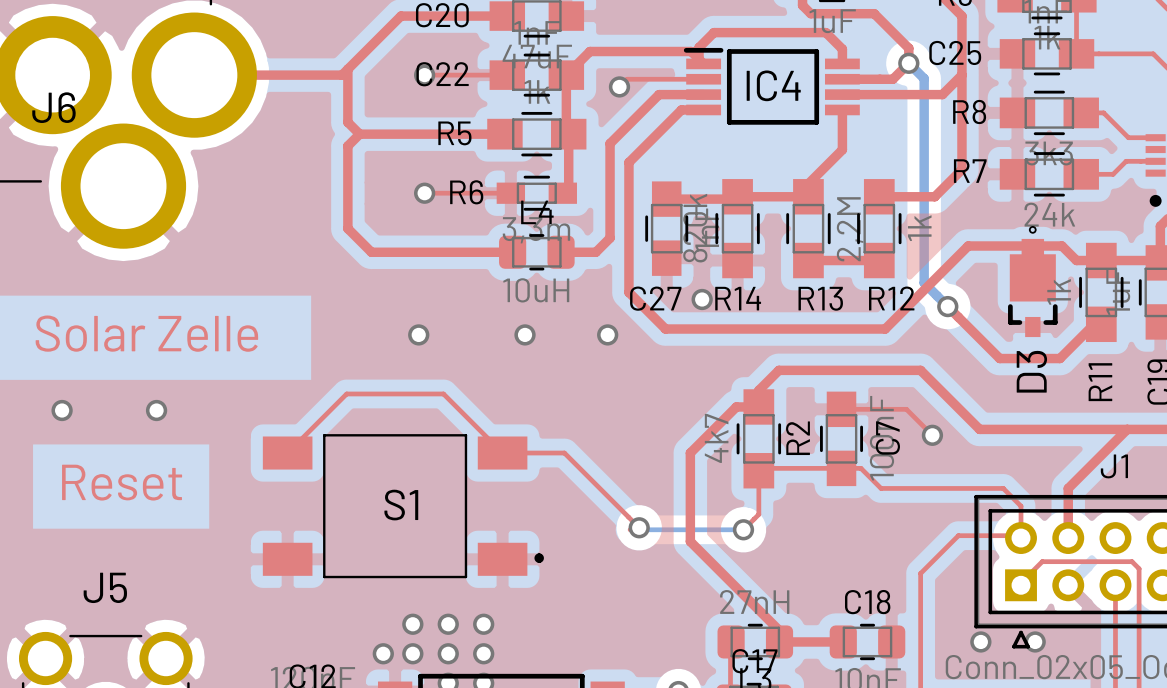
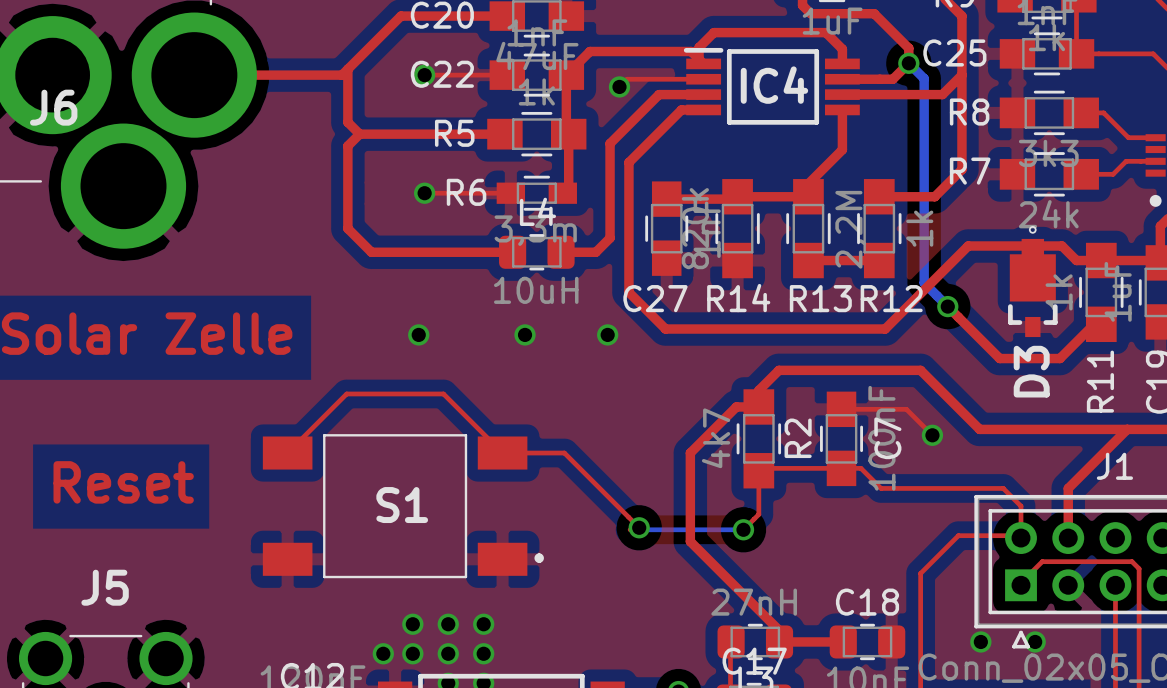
via: (702, 299) -> none
via: (62, 410) -> none
via: (156, 410) -> none

